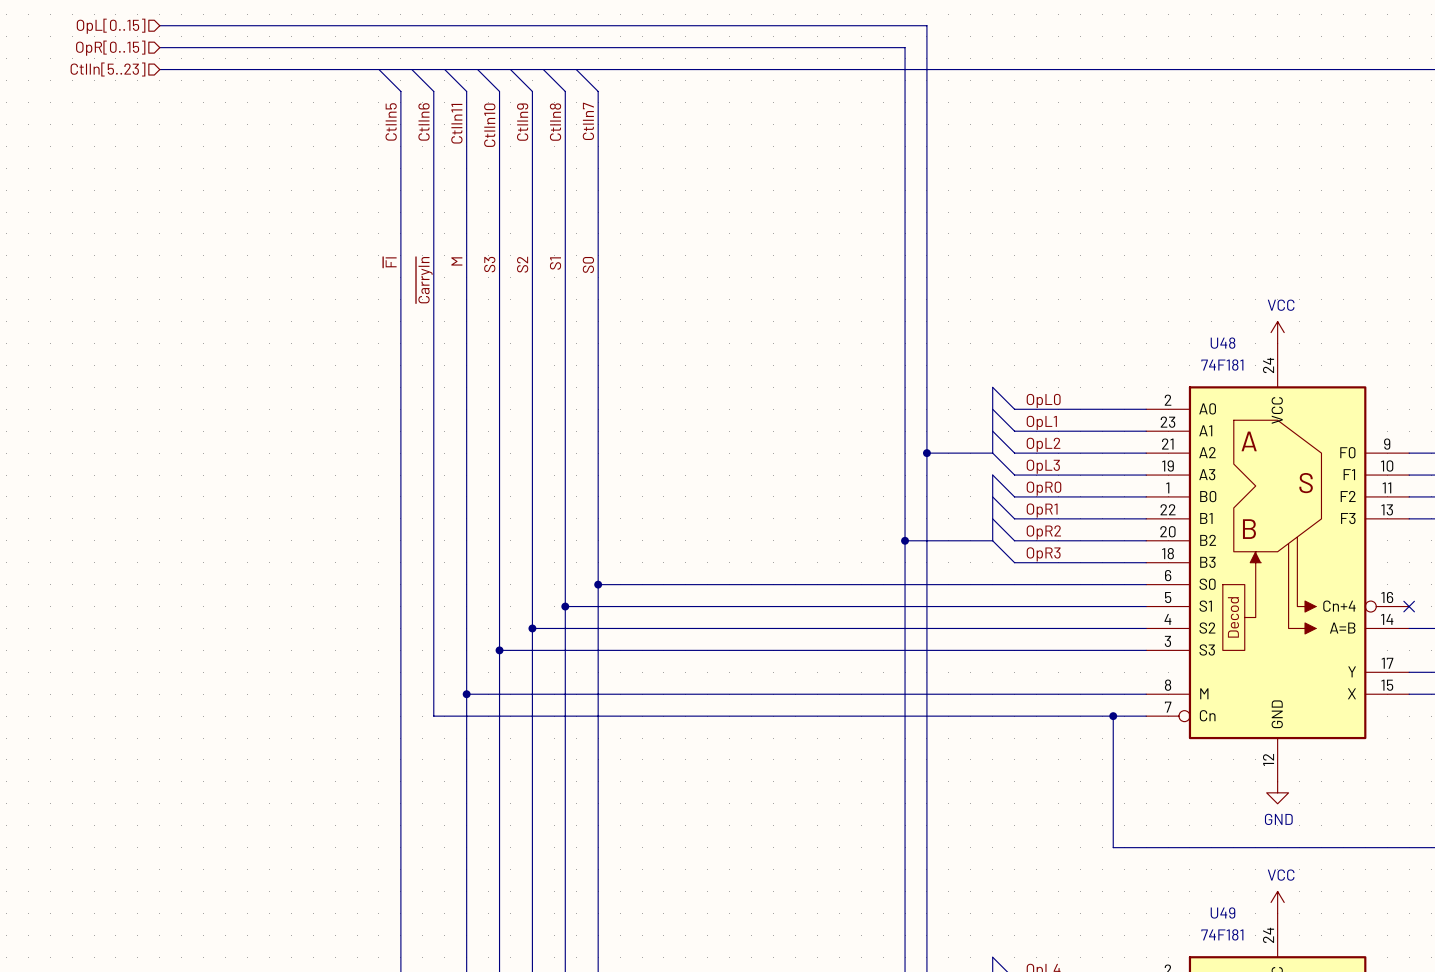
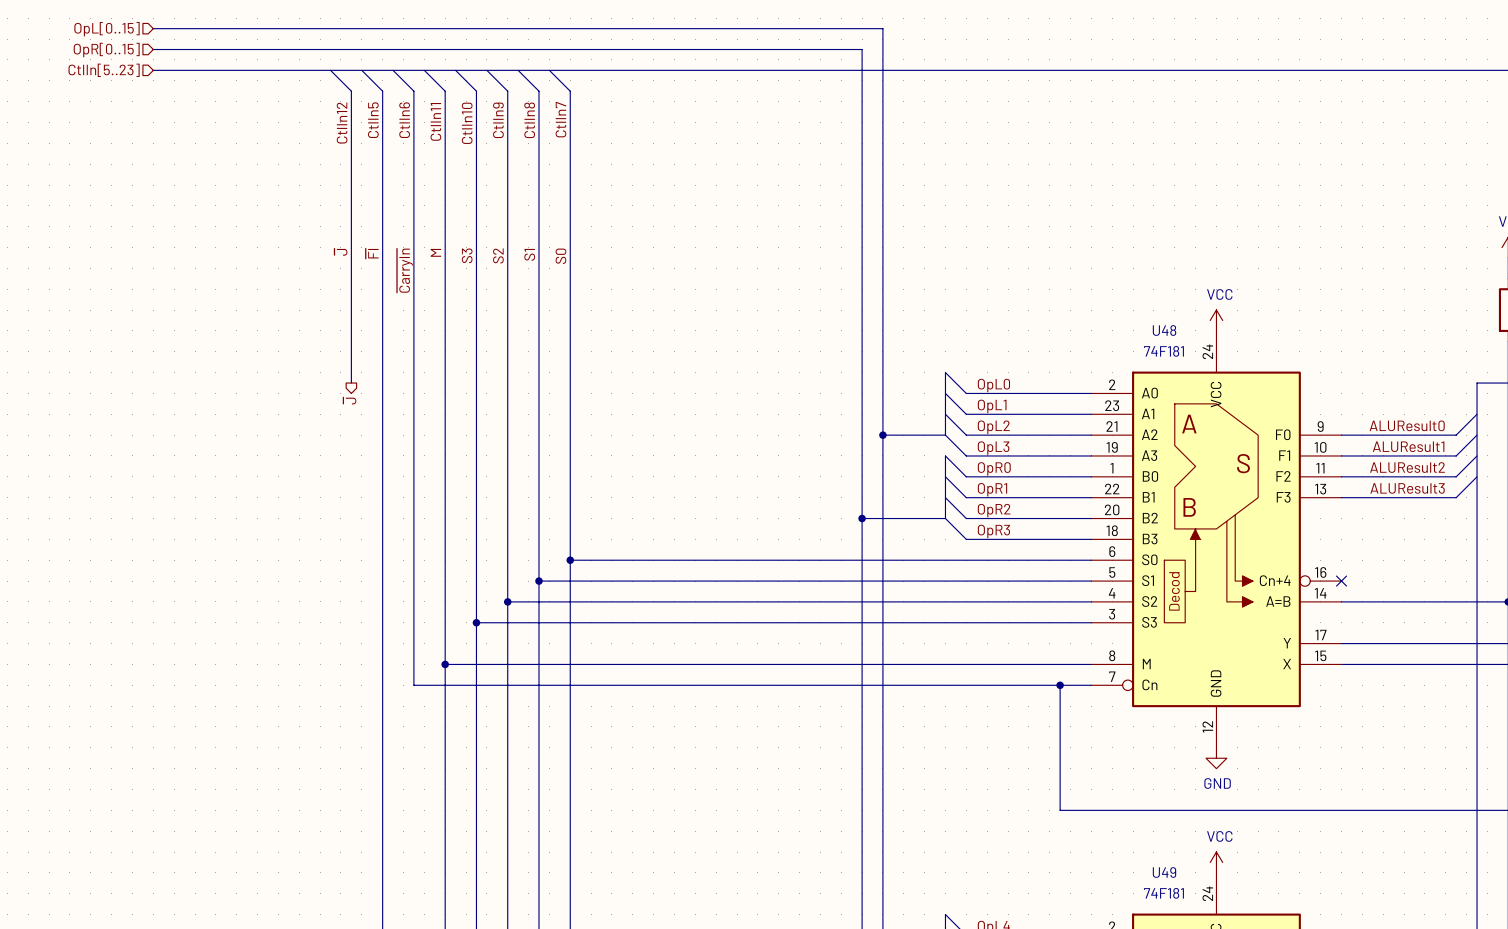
wire: none -> (330, 70) (351, 91) (351, 383)
label: none -> CtlIn12 (342, 123)
label: none -> ~{J} (340, 252)
hierarchical label: none -> ~{J} (349, 400)

